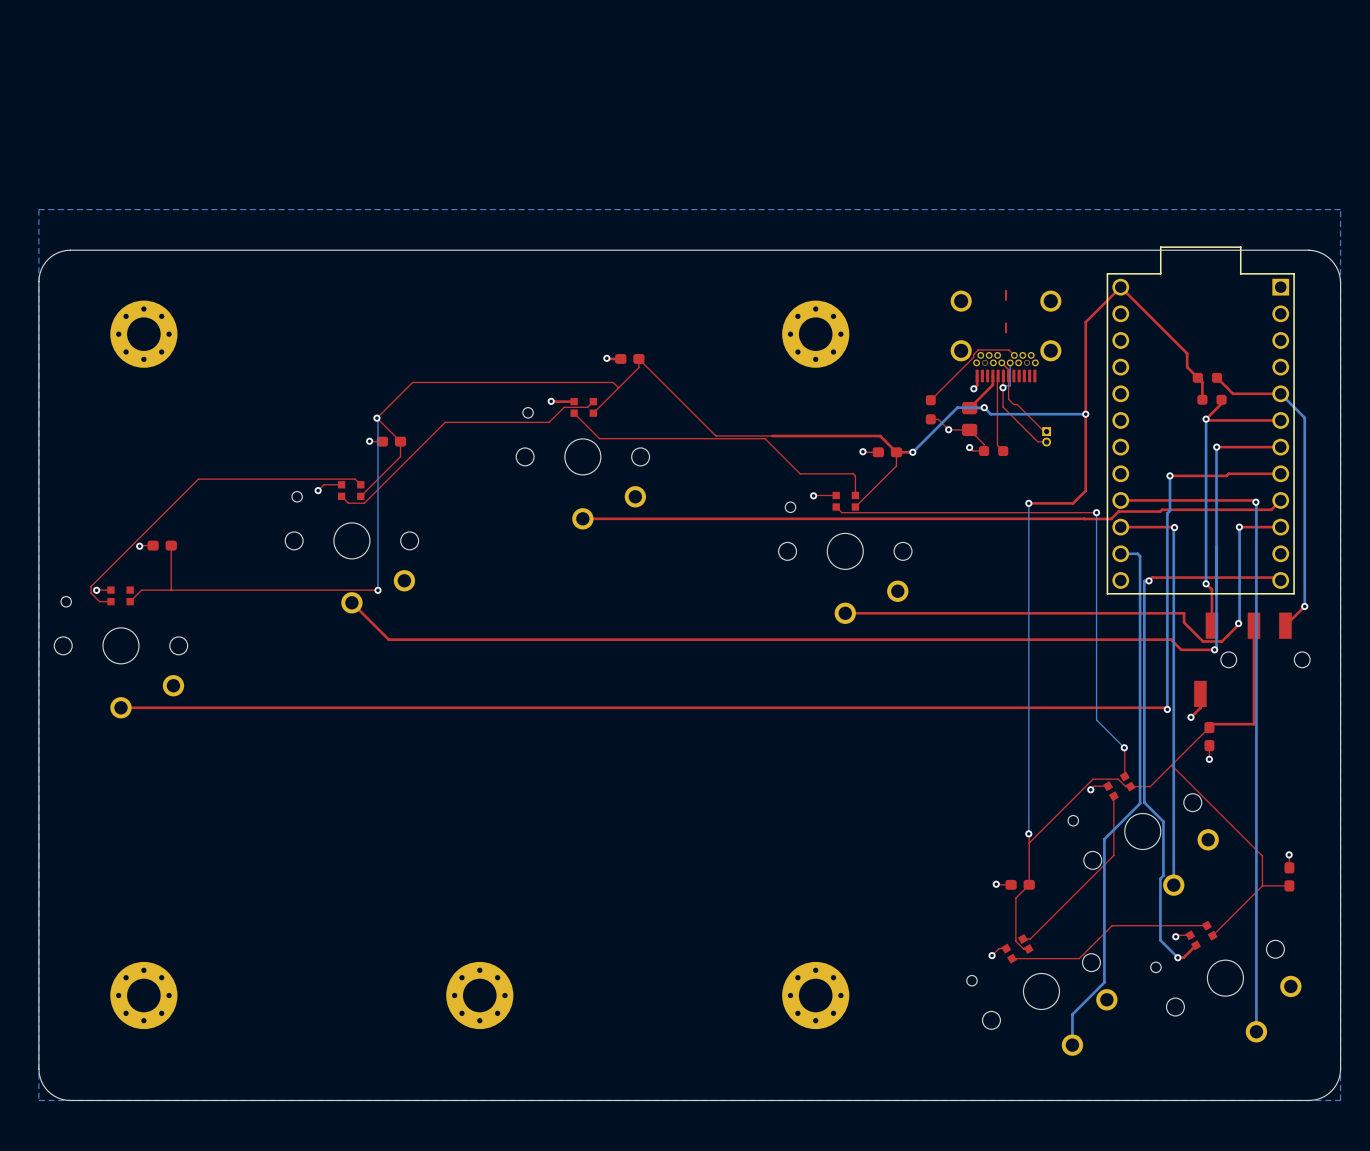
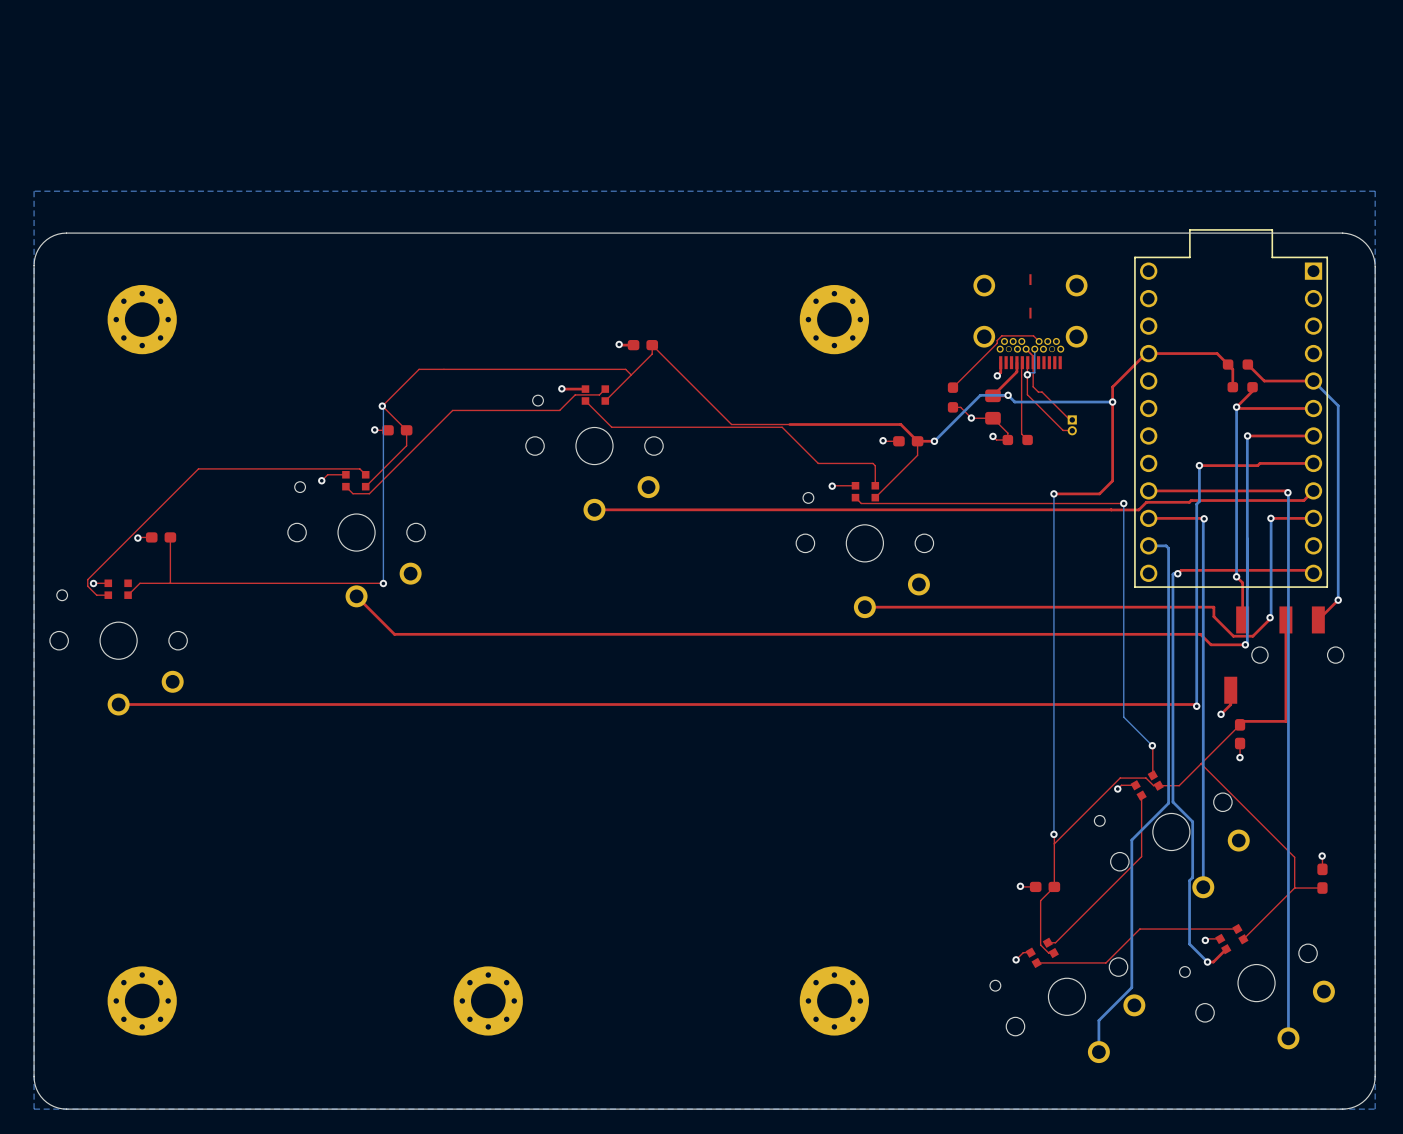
top track: none -> (1145, 353) (1112, 387)
top track: (1187, 367) (1187, 353) (1120, 287) (1085, 322) (1085, 399) -> (1217, 353) (1148, 353)

